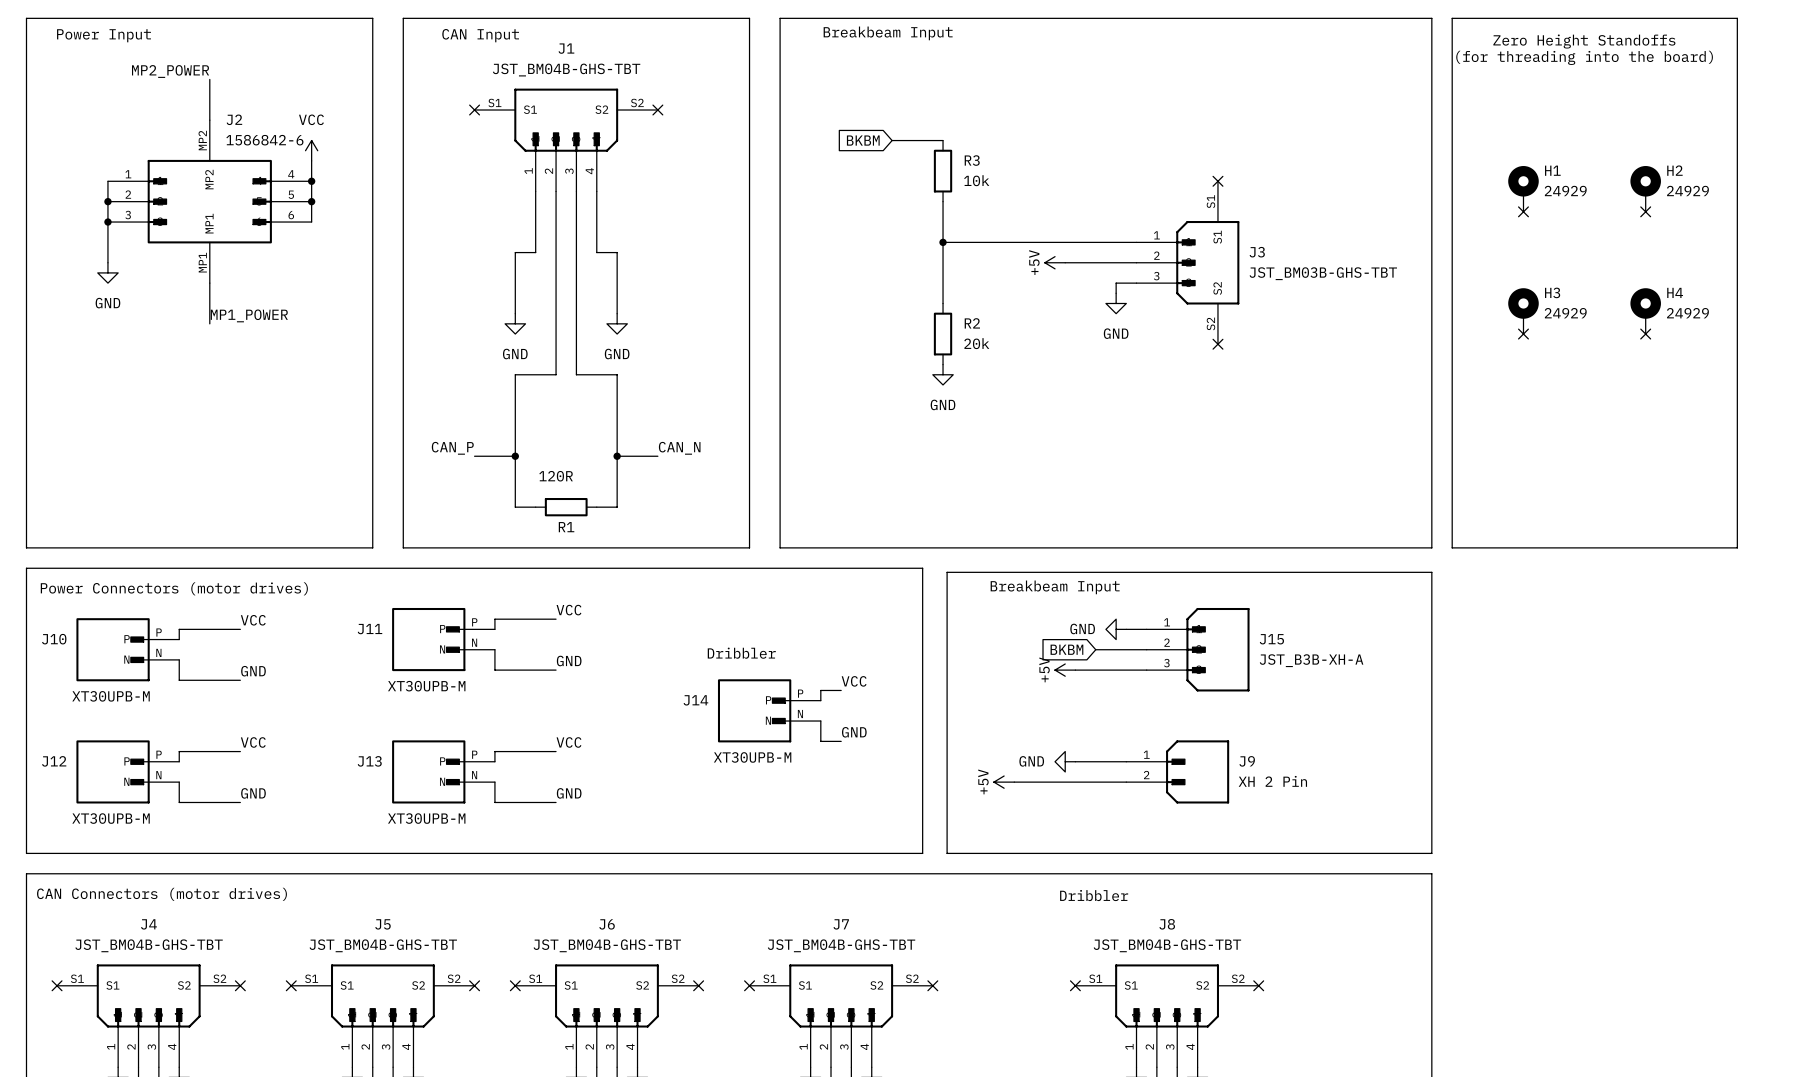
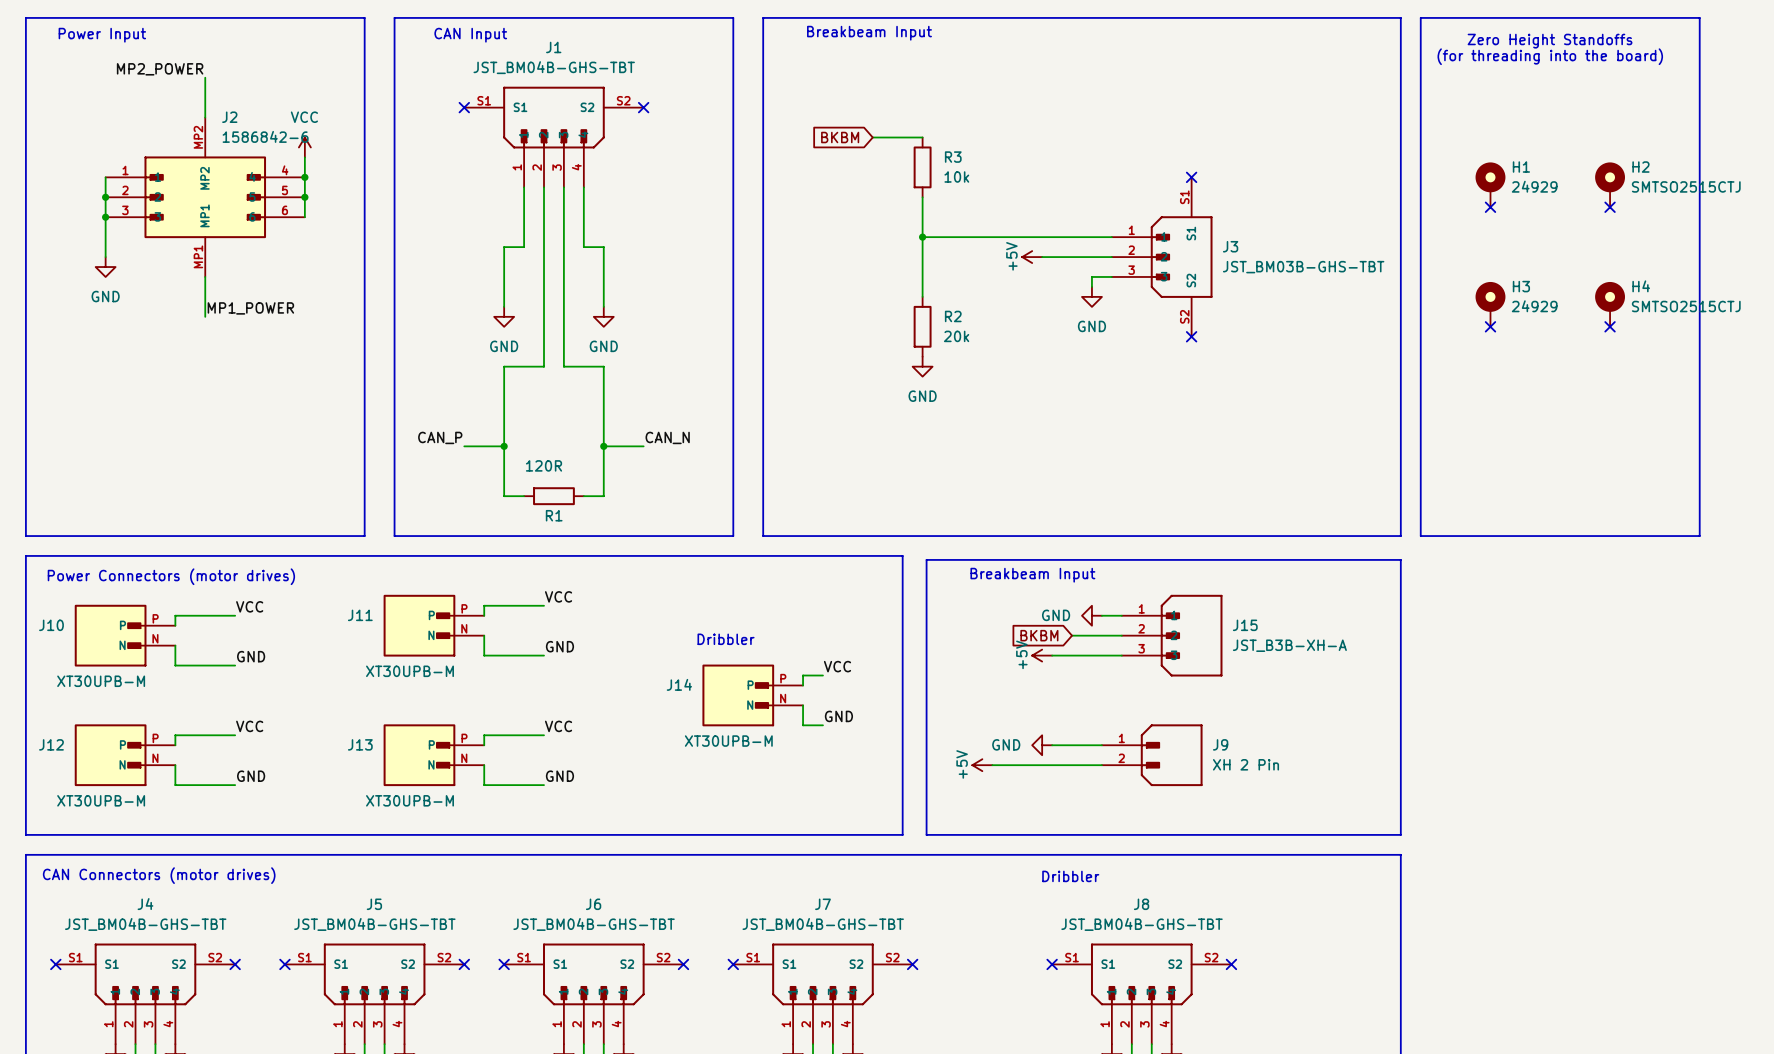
H2 value: 24929 (1687, 191) -> SMTSO2515CTJ (1686, 186)
H4 value: 24929 (1687, 313) -> SMTSO2515CTJ (1686, 306)

